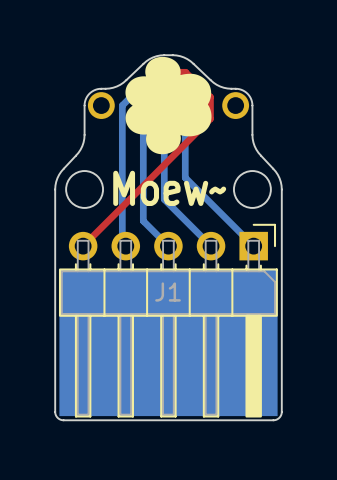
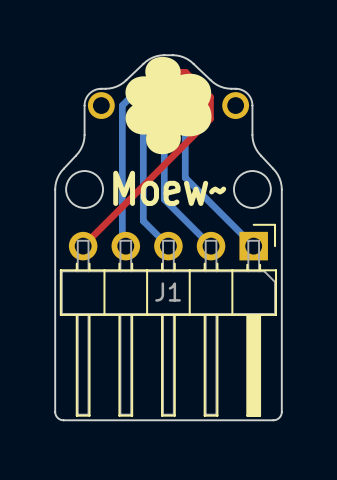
J1 footprint: [58, 223, 278, 418] -> [59, 223, 278, 417]
drawing: [59, 269, 278, 417] -> none

